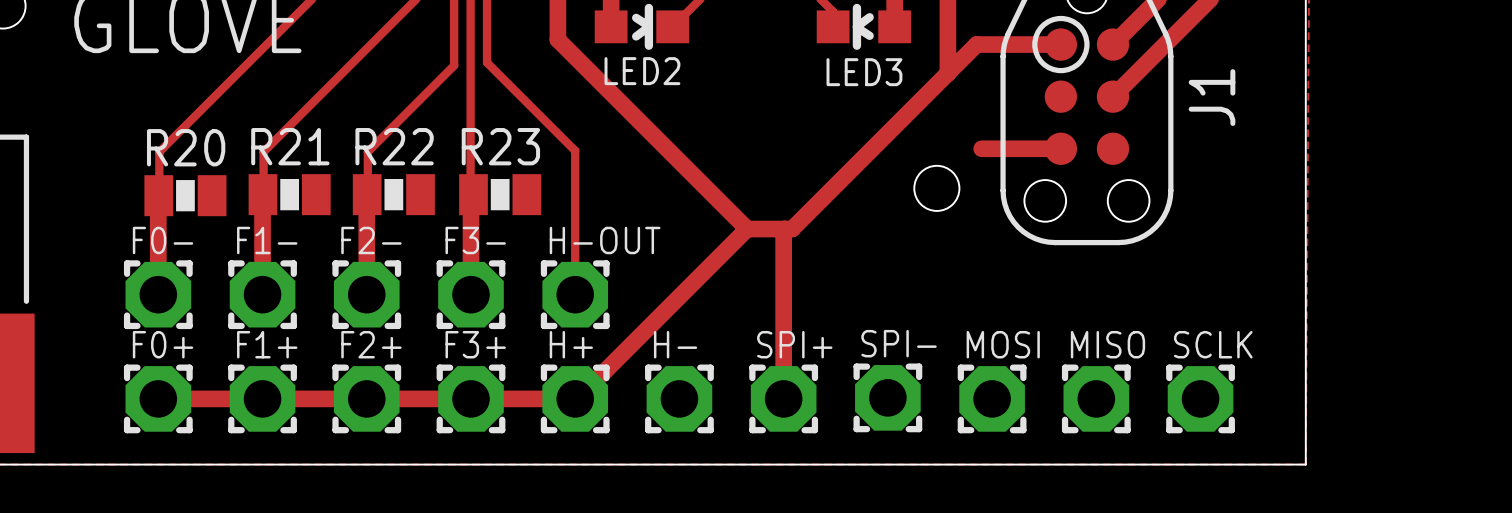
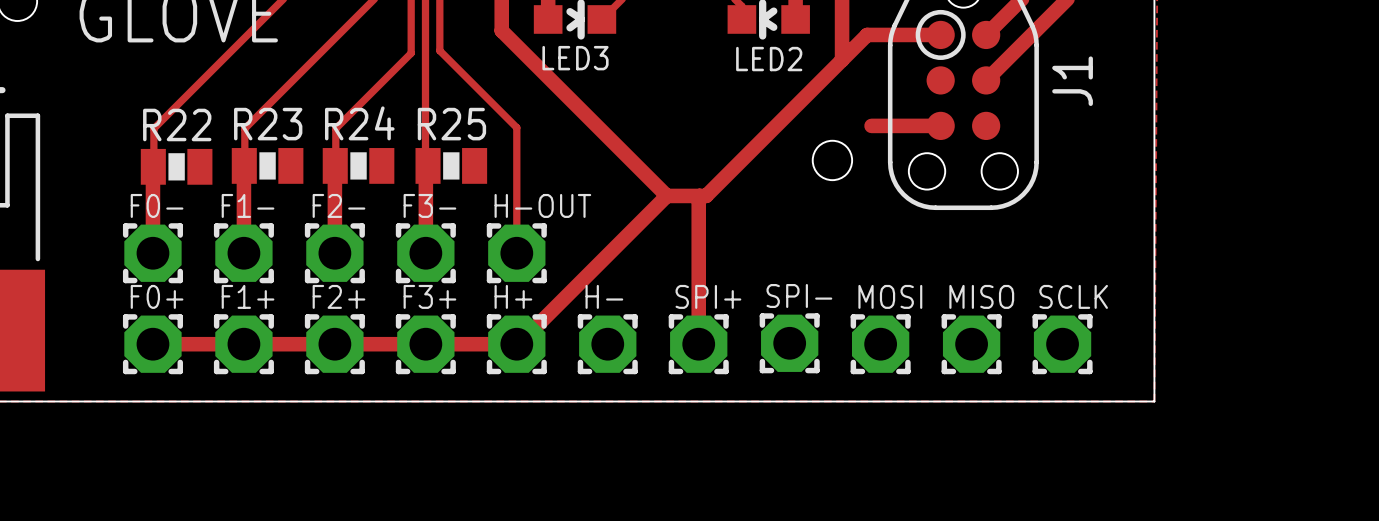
LED2 name: LED2 (642, 71) -> LED3 (575, 58)
LED3 name: LED3 (864, 72) -> LED2 (769, 59)
R21 name: R21 (290, 146) -> R23 (268, 124)
R22 name: R22 (394, 146) -> R24 (359, 123)
R23 name: R23 (500, 146) -> R25 (451, 124)
R20 name: R20 (186, 147) -> R22 (177, 124)

